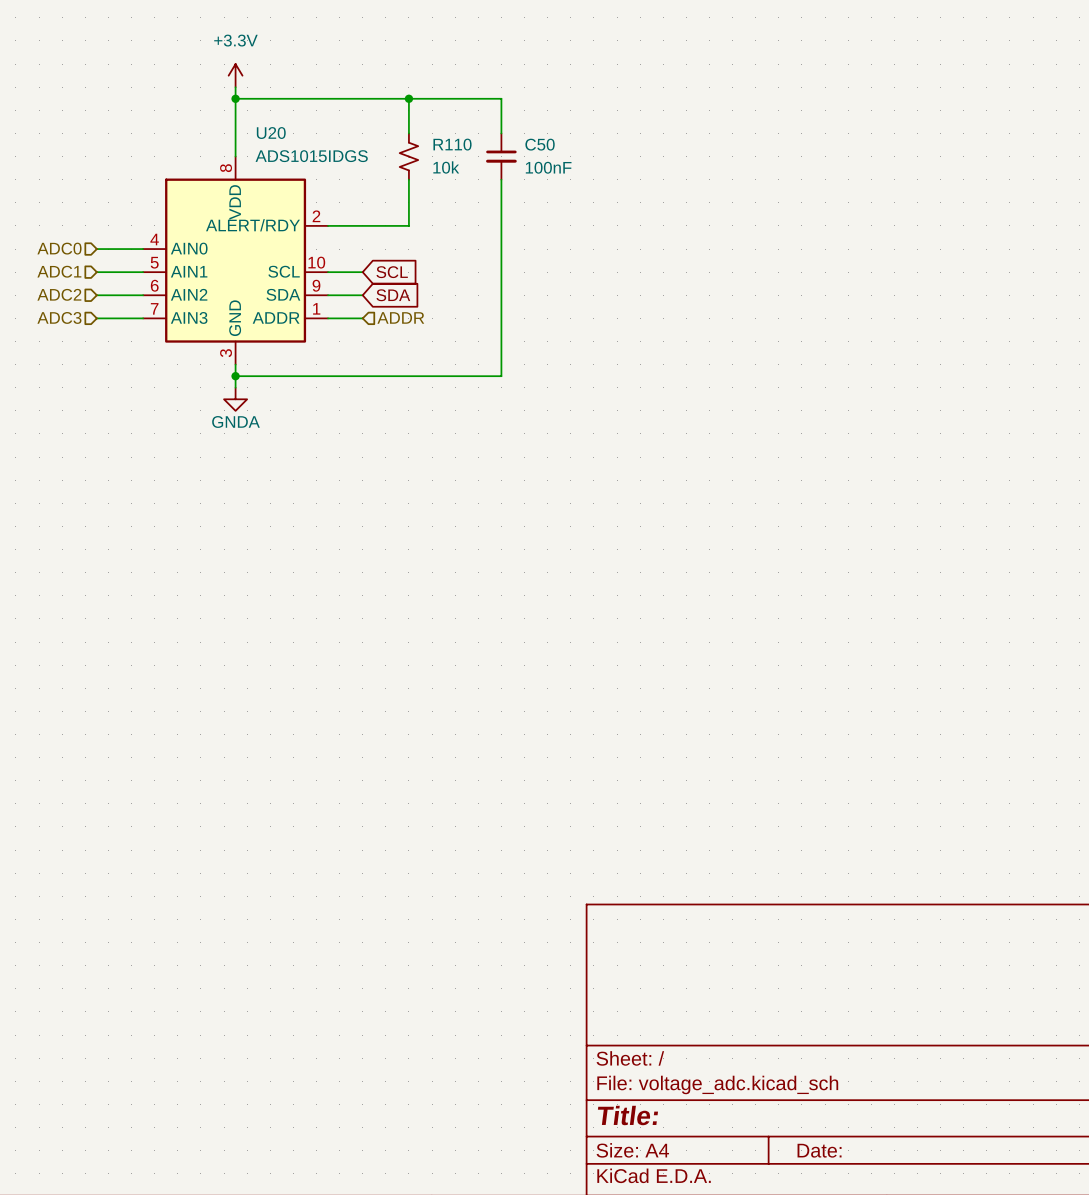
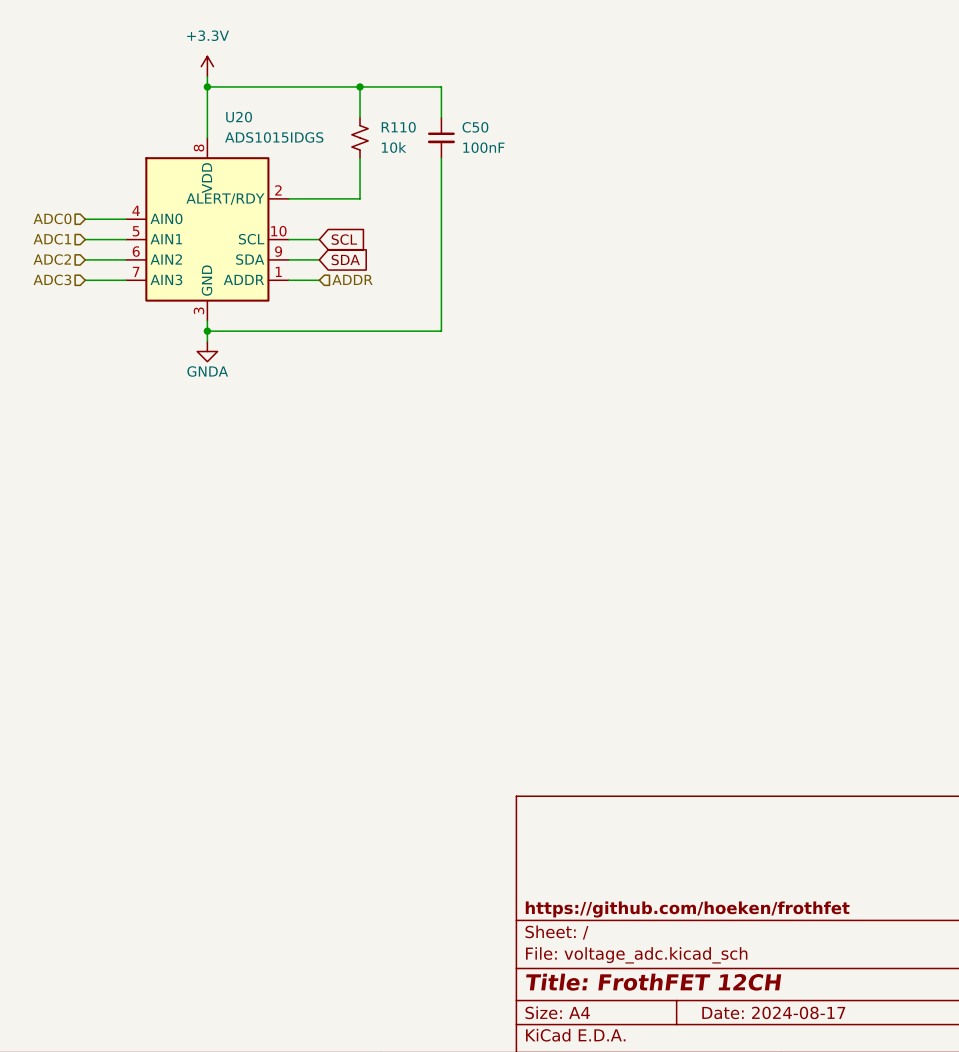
title block: none -> https://github.com/hoeken/frothfet (687, 909)
title block: Title: (627, 1115) -> Title: FrothFET 12CH (653, 982)
title block: Date: (819, 1150) -> Date: 2024-08-17 (773, 1012)

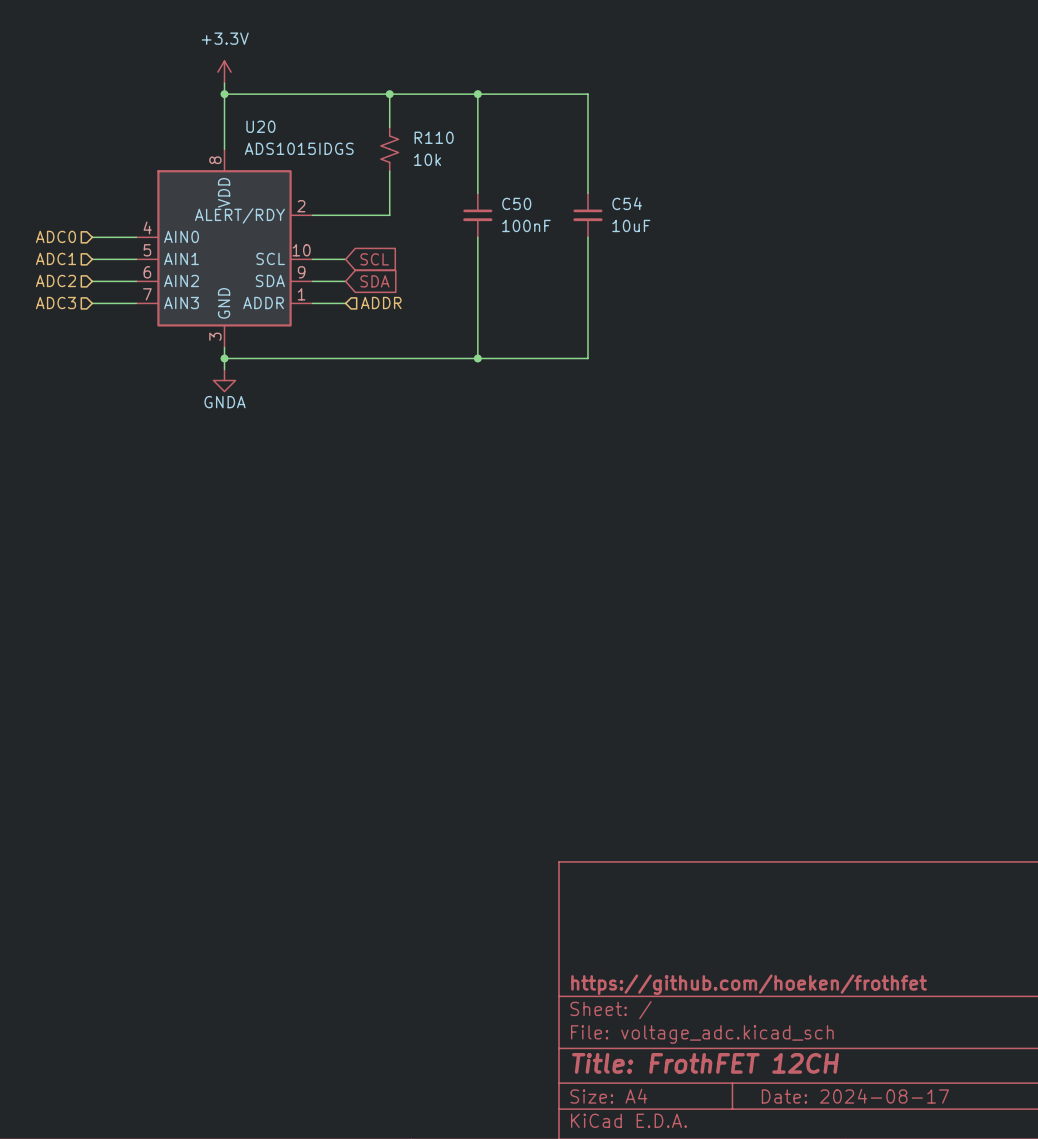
wire: none -> (477, 94) (587, 94) (587, 193)
junction: none -> (477, 94)
C50 position: (441, 137) -> (477, 215)
C54: none -> 10uF (587, 215)
wire: none -> (587, 237) (587, 358) (477, 358)
junction: none -> (477, 358)

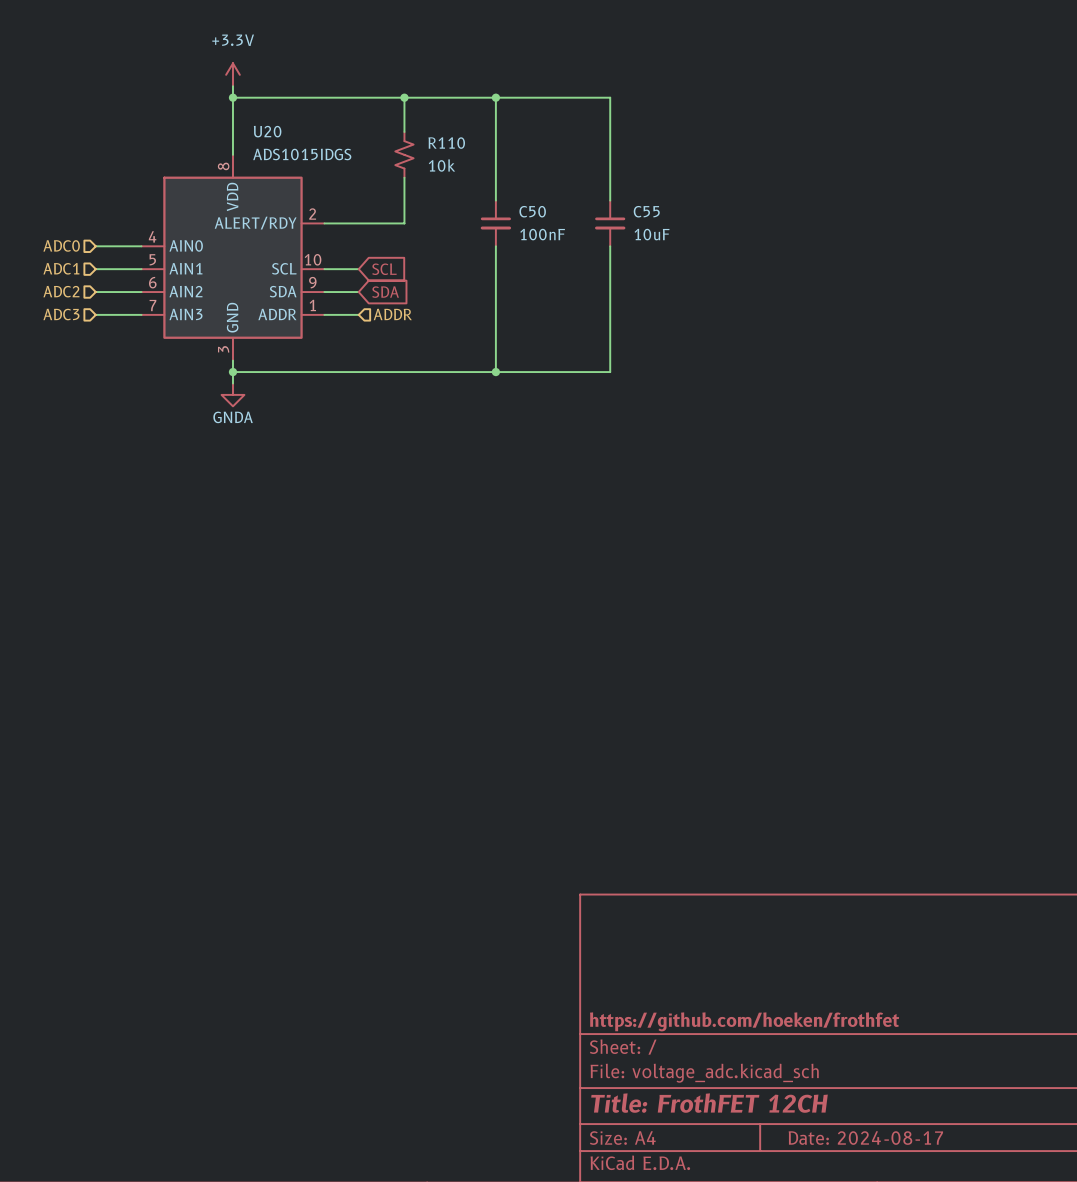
C54 name: C54 (627, 203) -> C55 (646, 211)

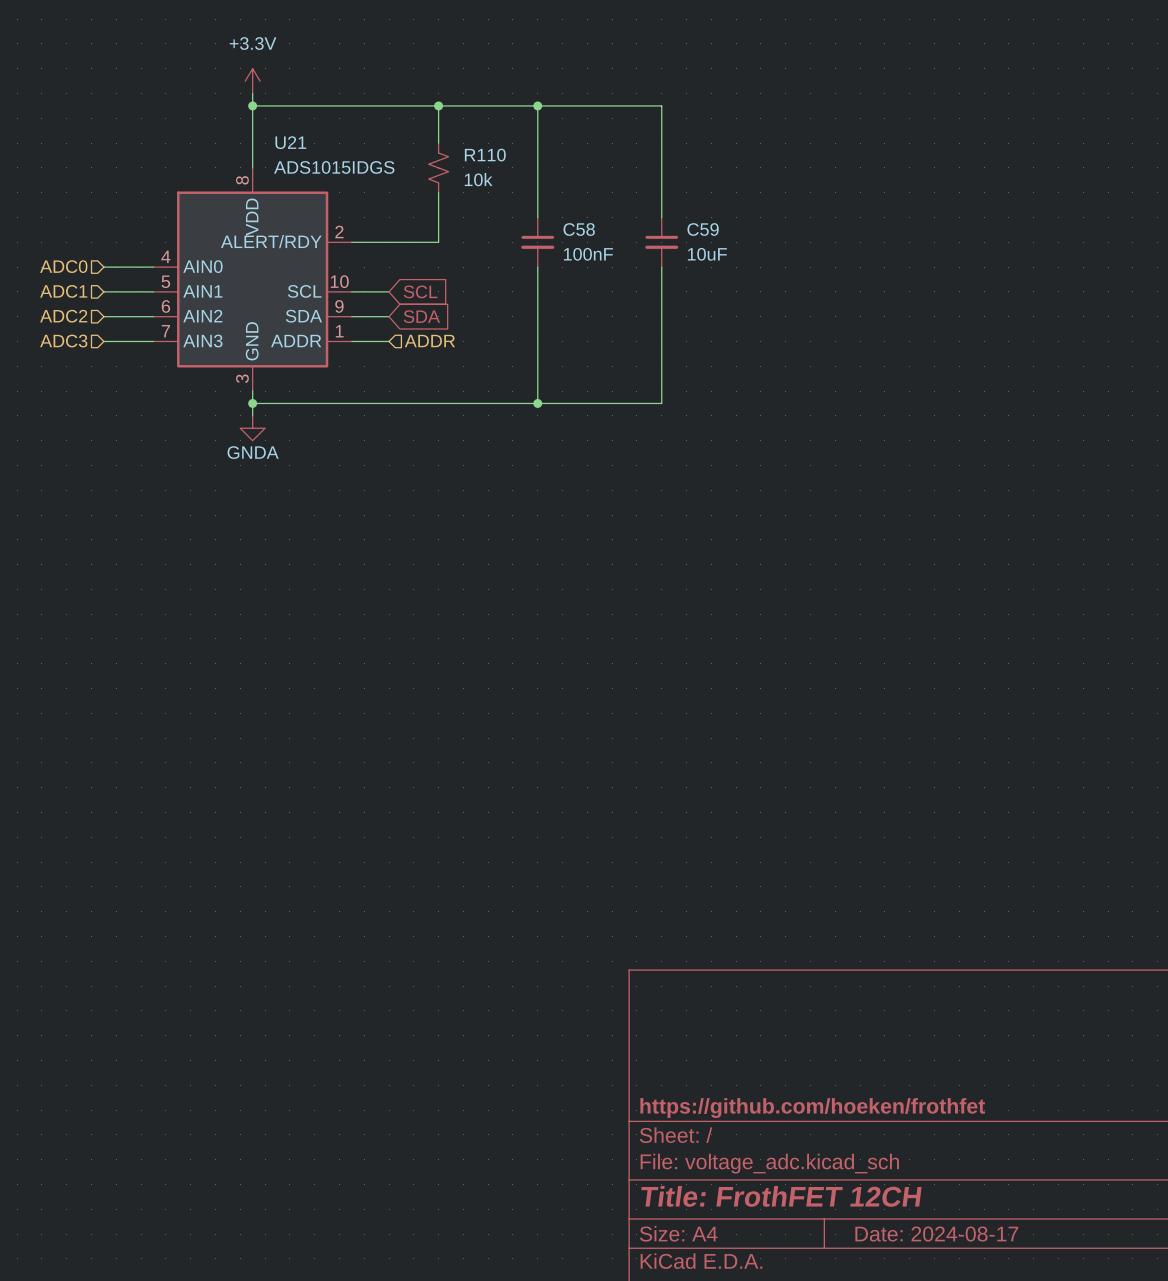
U20 name: U20 (267, 131) -> U21 (290, 142)
C50 name: C50 (532, 211) -> C58 (579, 229)
C55 name: C55 (646, 211) -> C59 (703, 229)

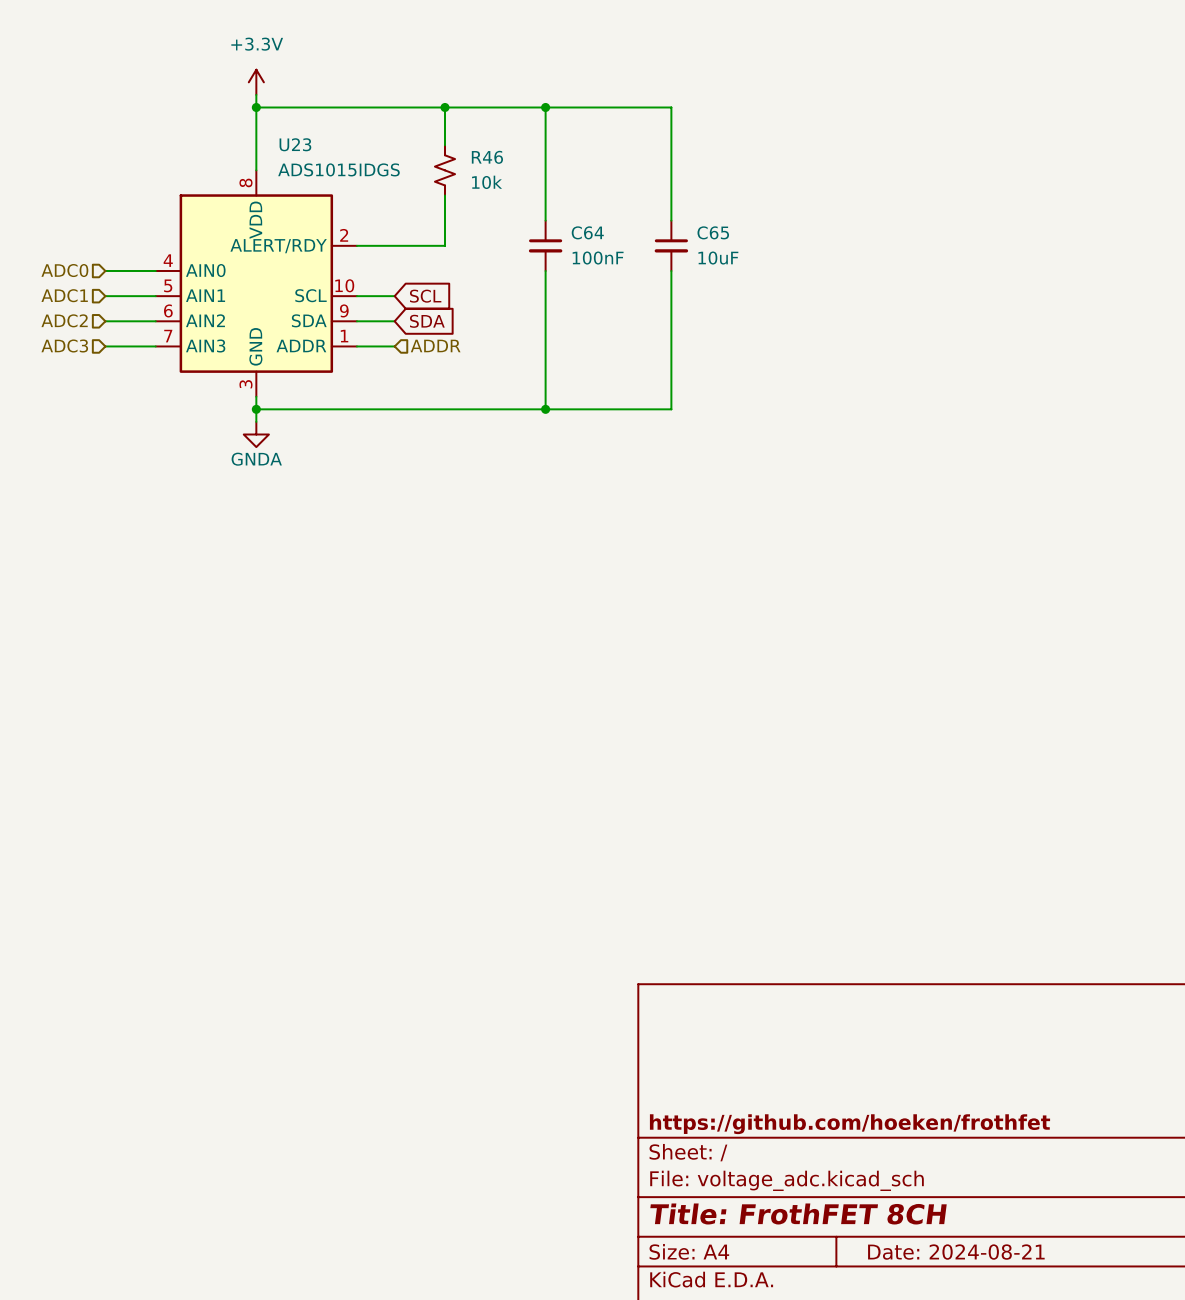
U21 name: U21 (290, 142) -> U23 (295, 144)
R110 name: R110 (485, 155) -> R46 (487, 157)
C58 name: C58 (579, 229) -> C64 (587, 232)
C59 name: C59 (703, 229) -> C65 (713, 232)
title block: Title: FrothFET 12CH (781, 1196) -> Title: FrothFET 8CH (798, 1213)
title block: Date: 2024-08-17 (936, 1234) -> Date: 2024-08-21 (956, 1252)

